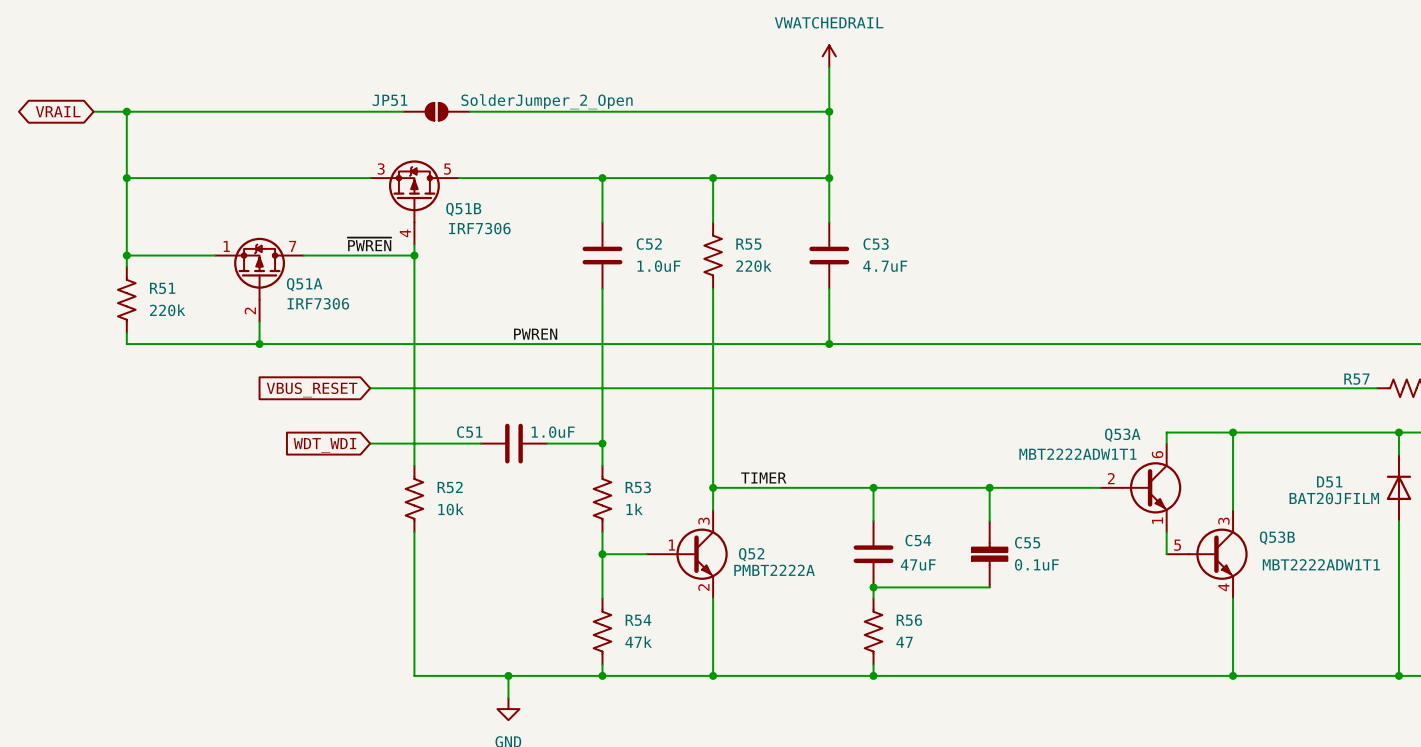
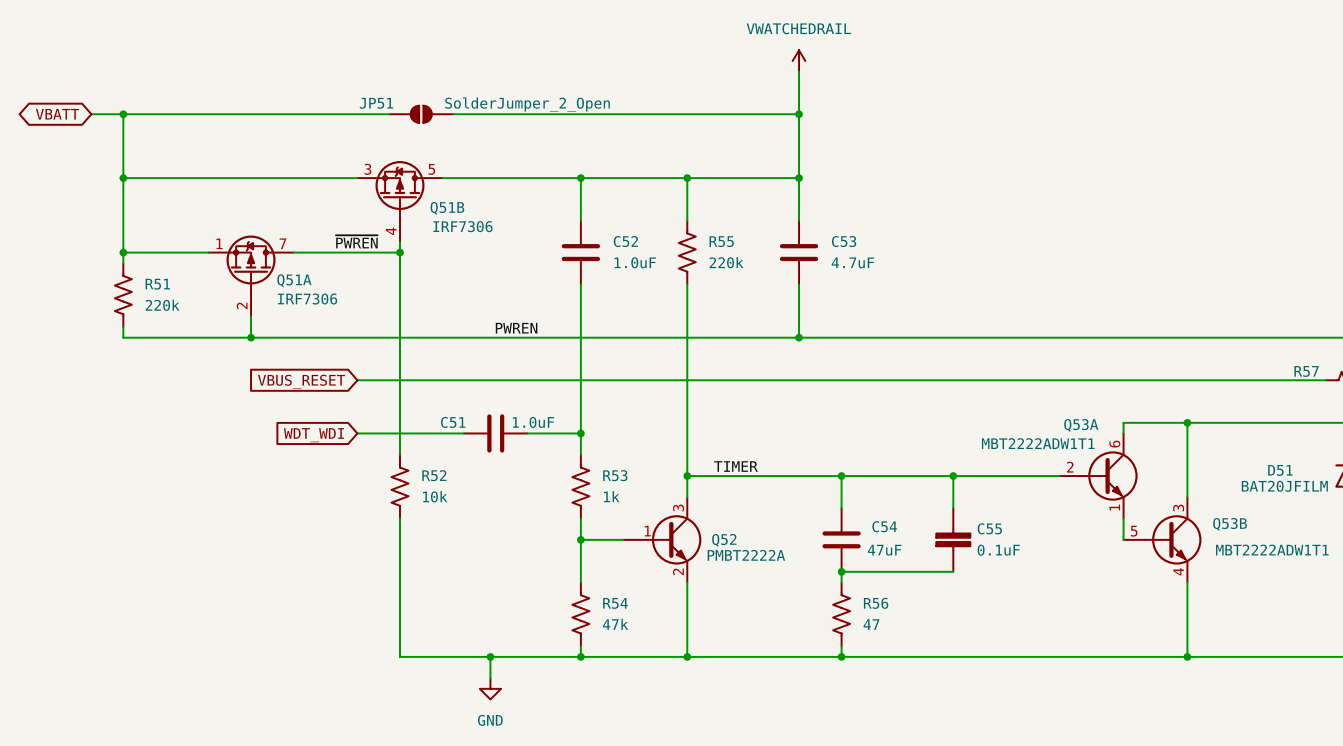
global label: VRAIL (58, 111) -> VBATT (57, 114)

